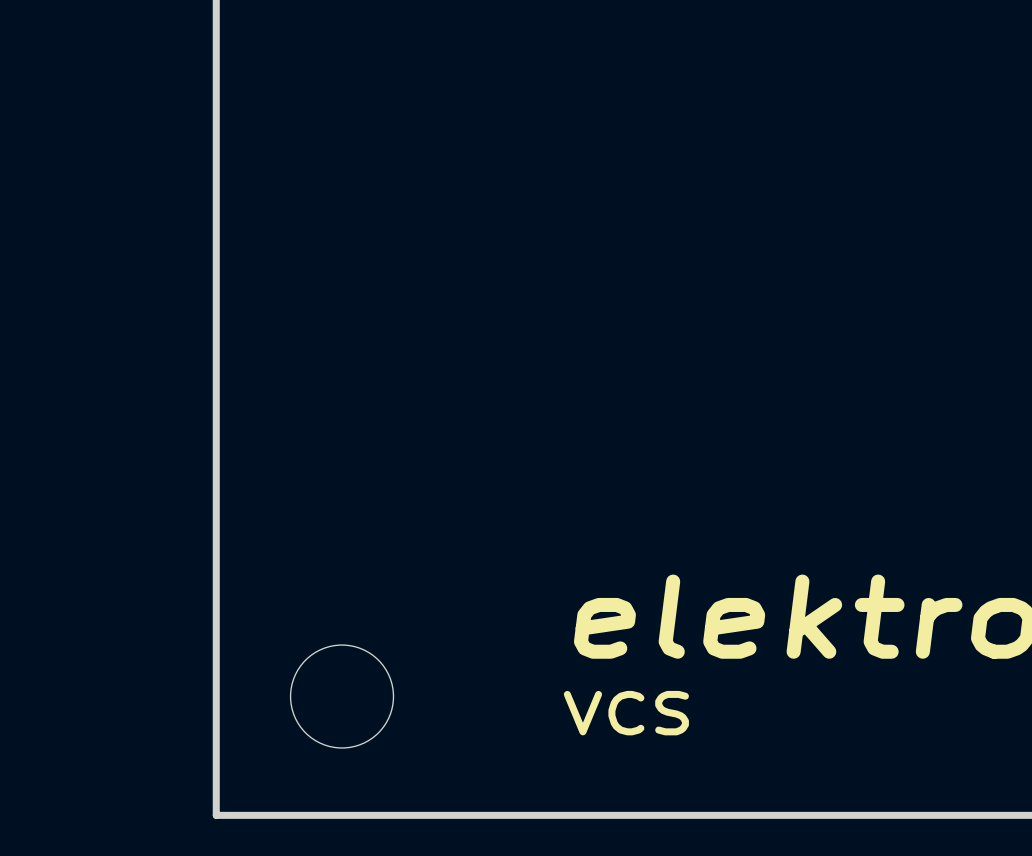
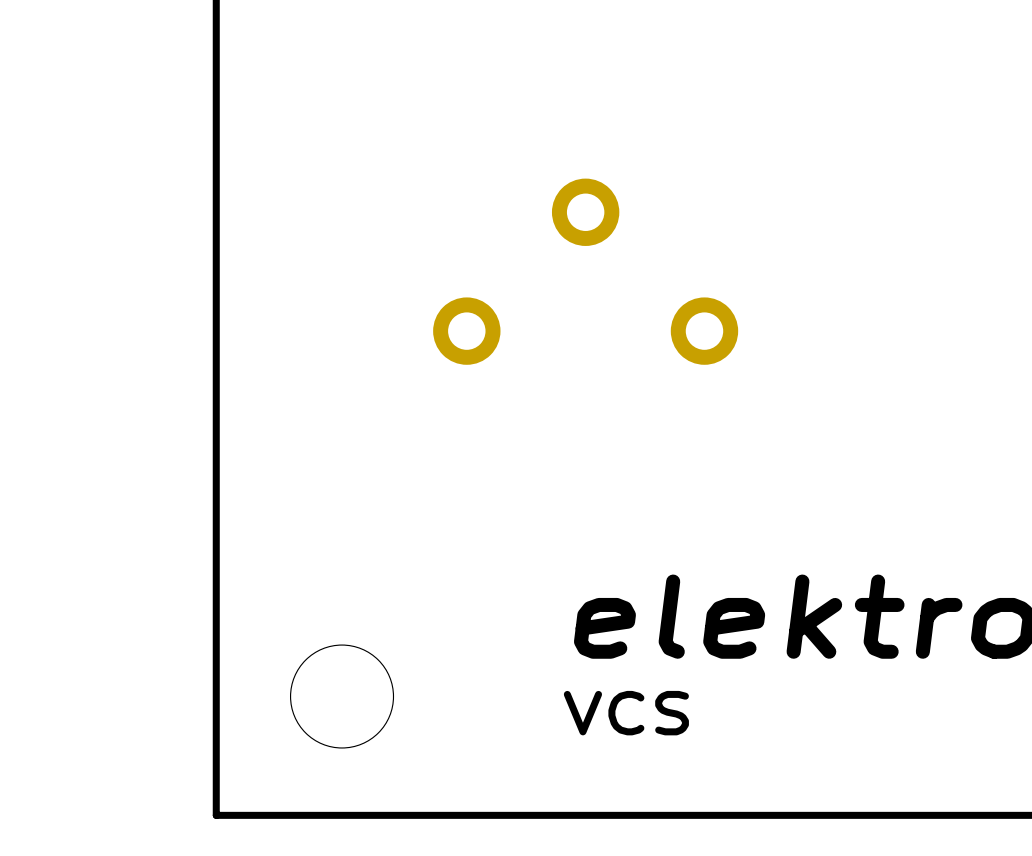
part: none -> (585, 271)

